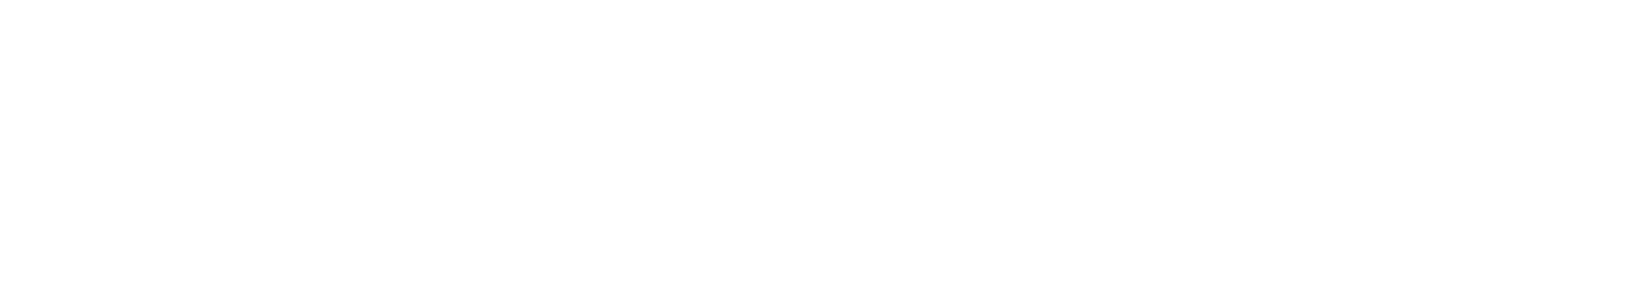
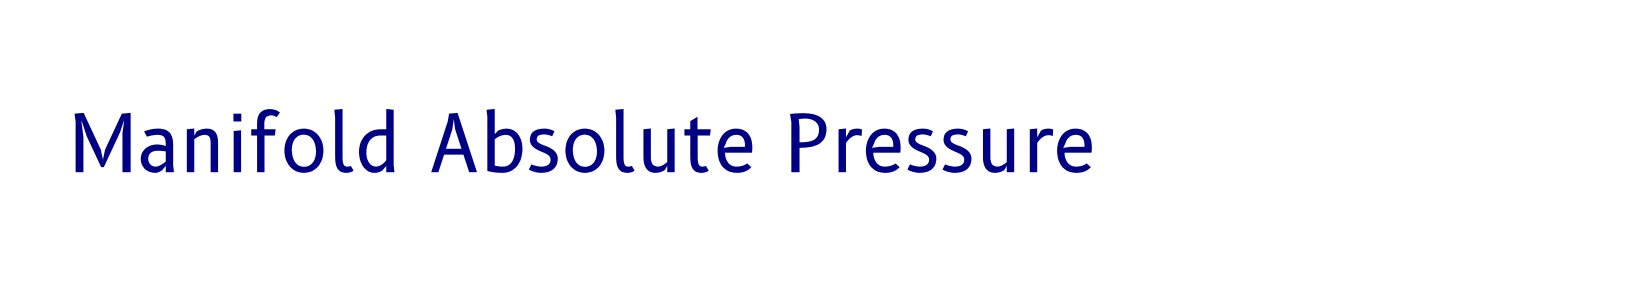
text: none -> Manifold Absolute Pressure (583, 140)

